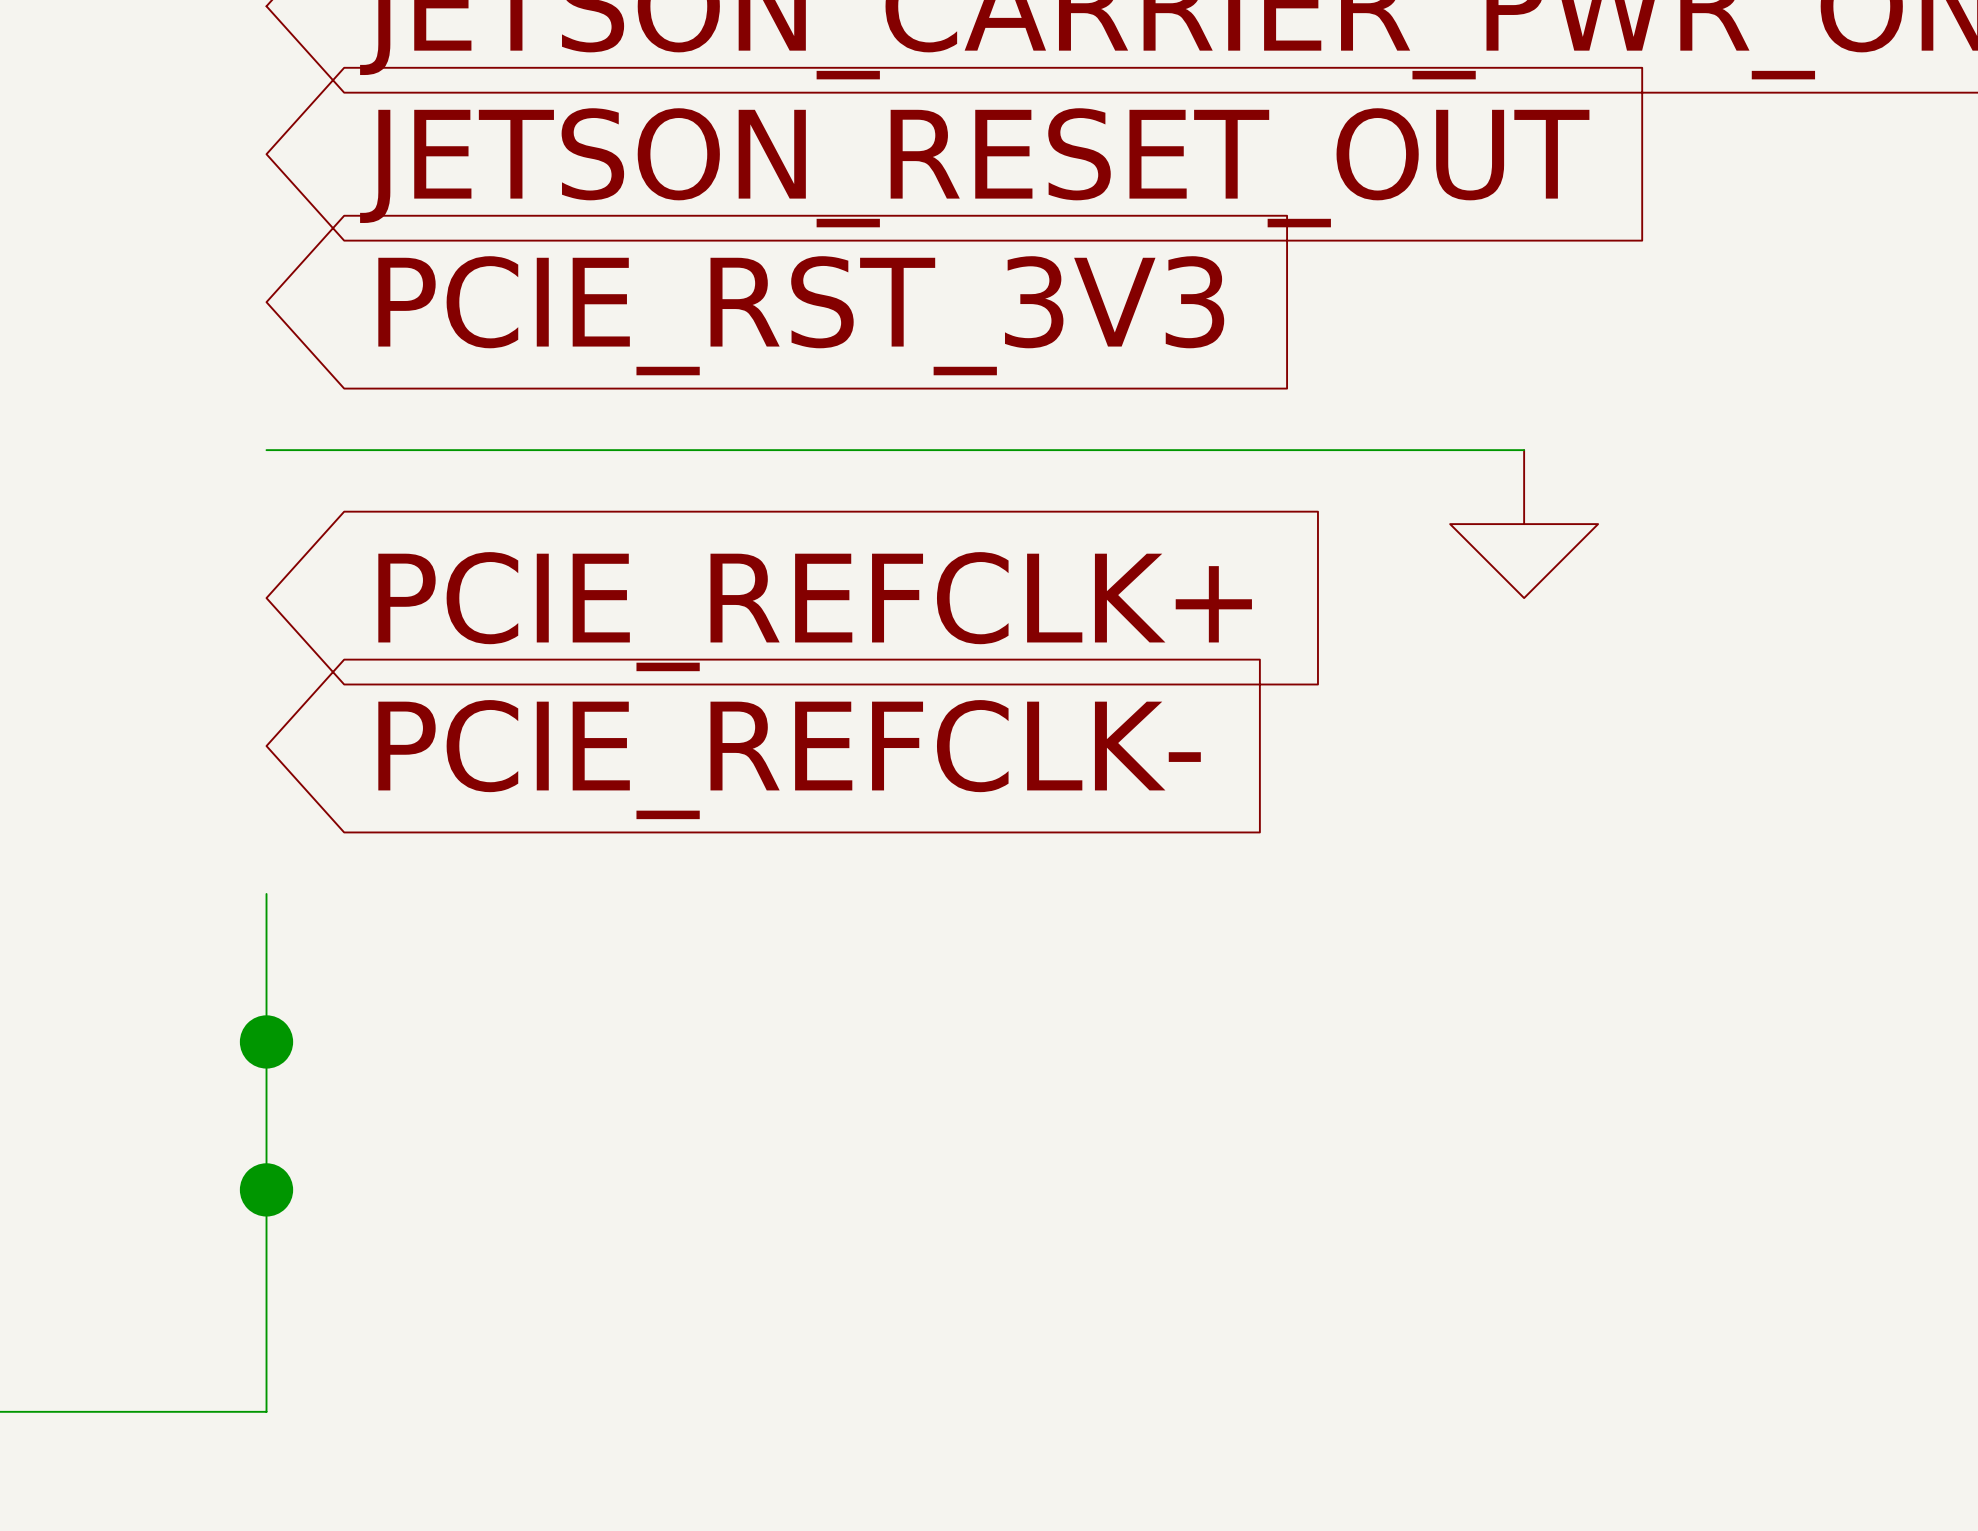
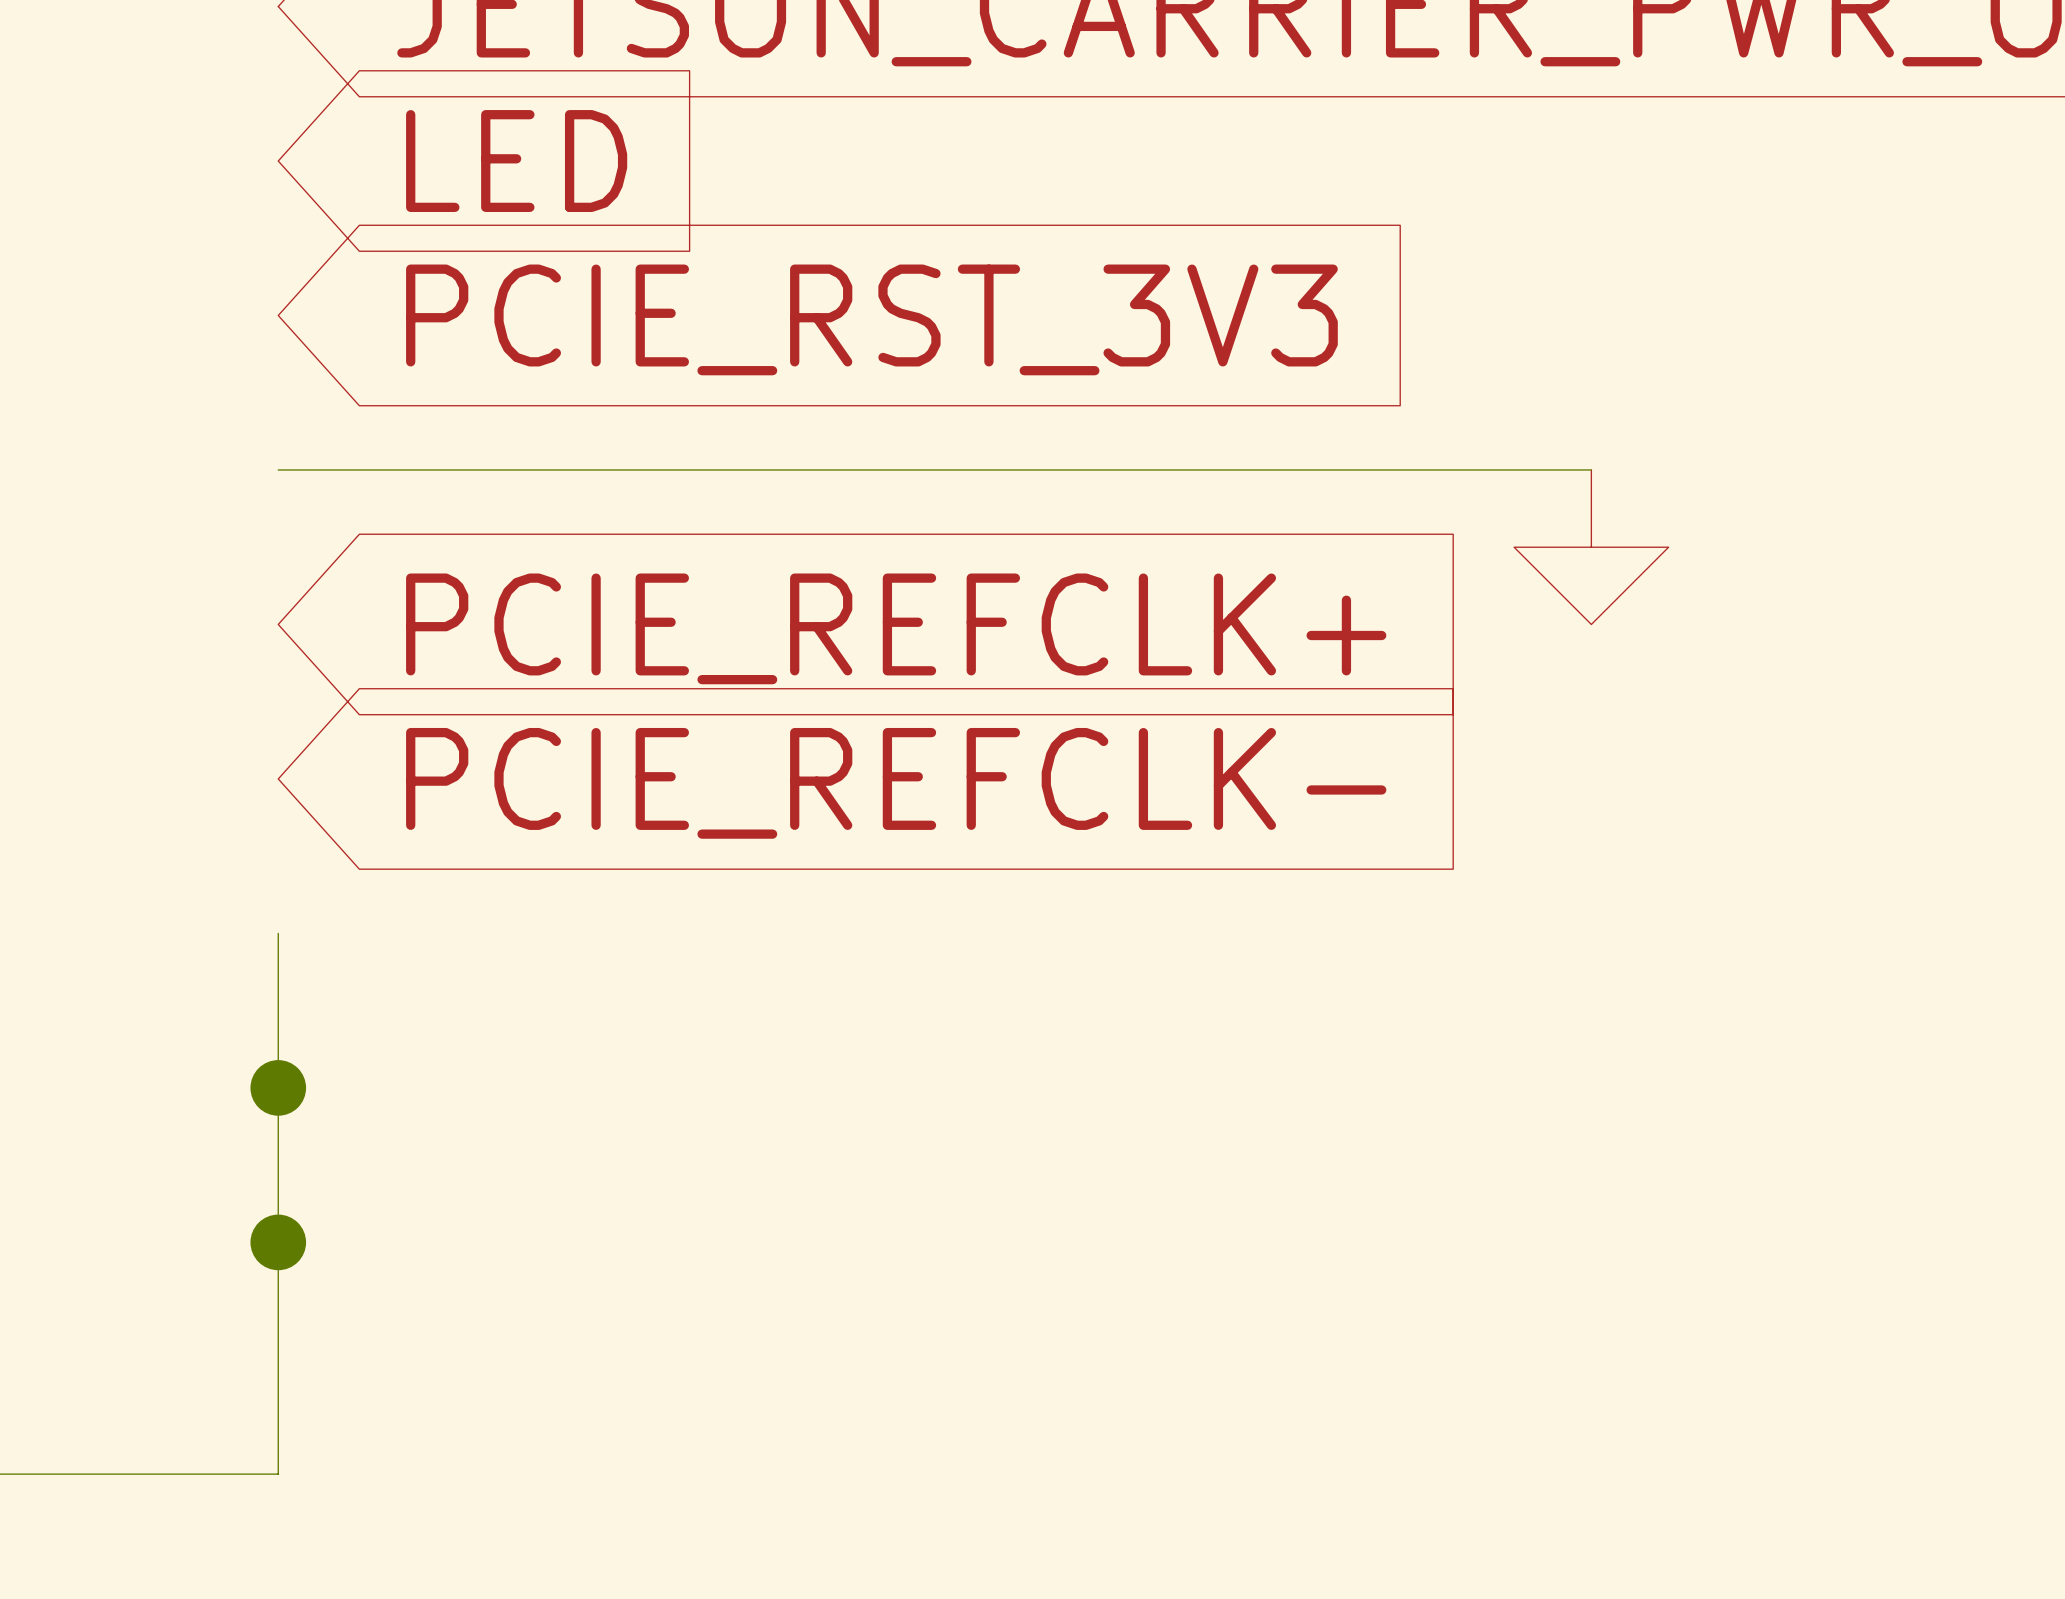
global label: JETSON_RESET_OUT (974, 167) -> LED (516, 161)

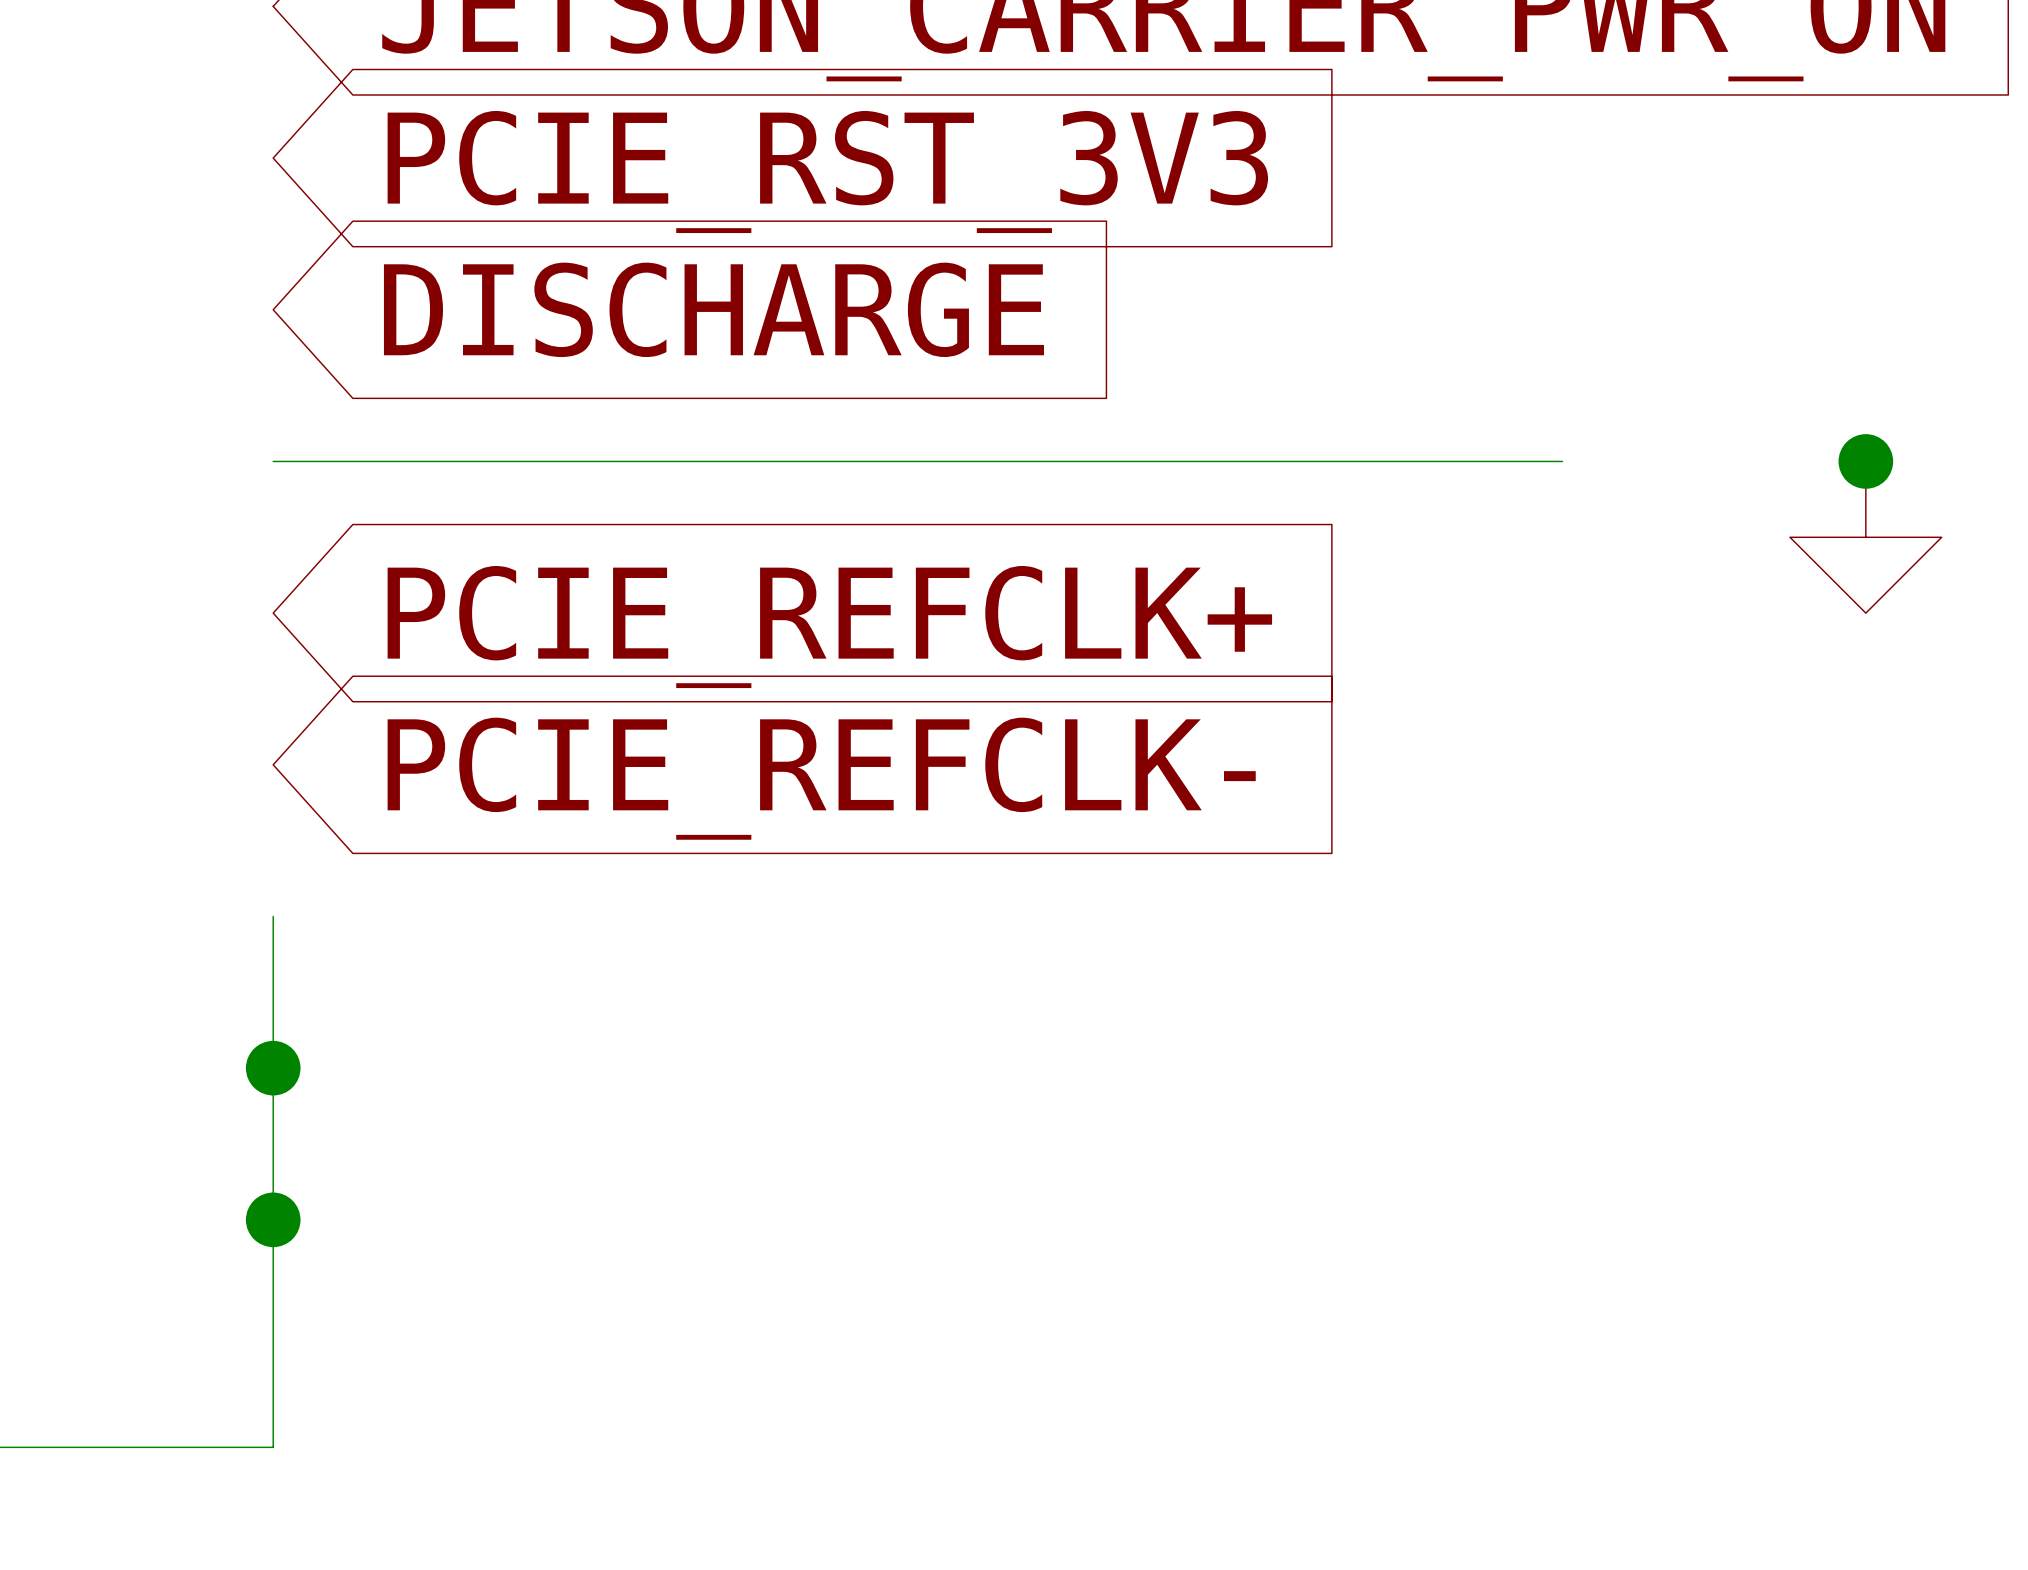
global label: LED (516, 161) -> PCIE_RST_3V3 (827, 171)
global label: PCIE_RST_3V3 (871, 319) -> DISCHARGE (713, 309)
junction: none -> (1865, 461)
power symbol position: (1591, 547) -> (1865, 537)

